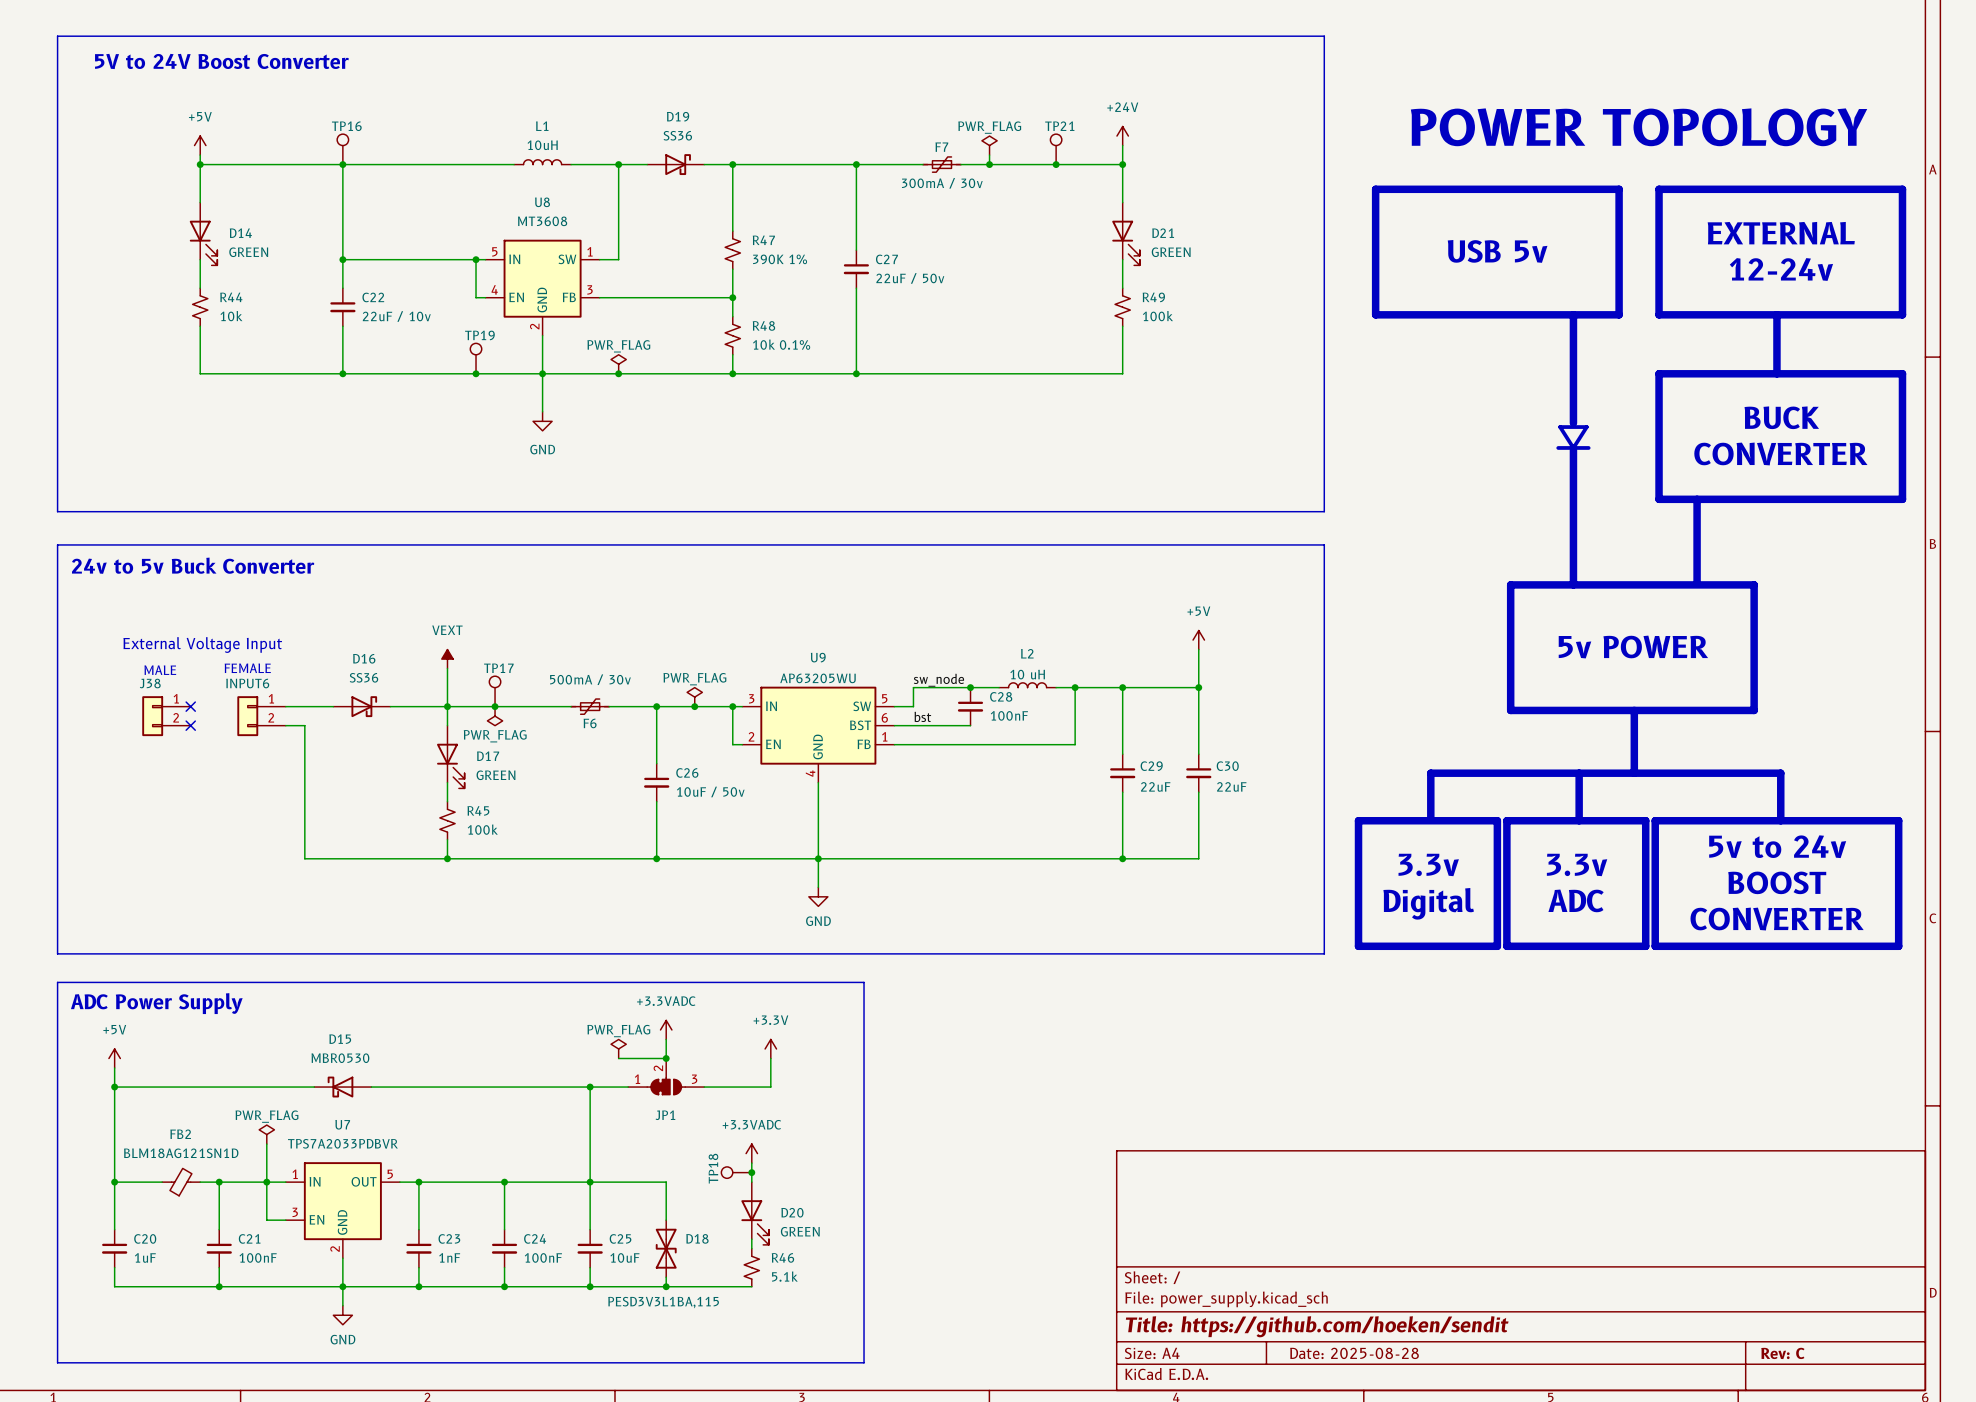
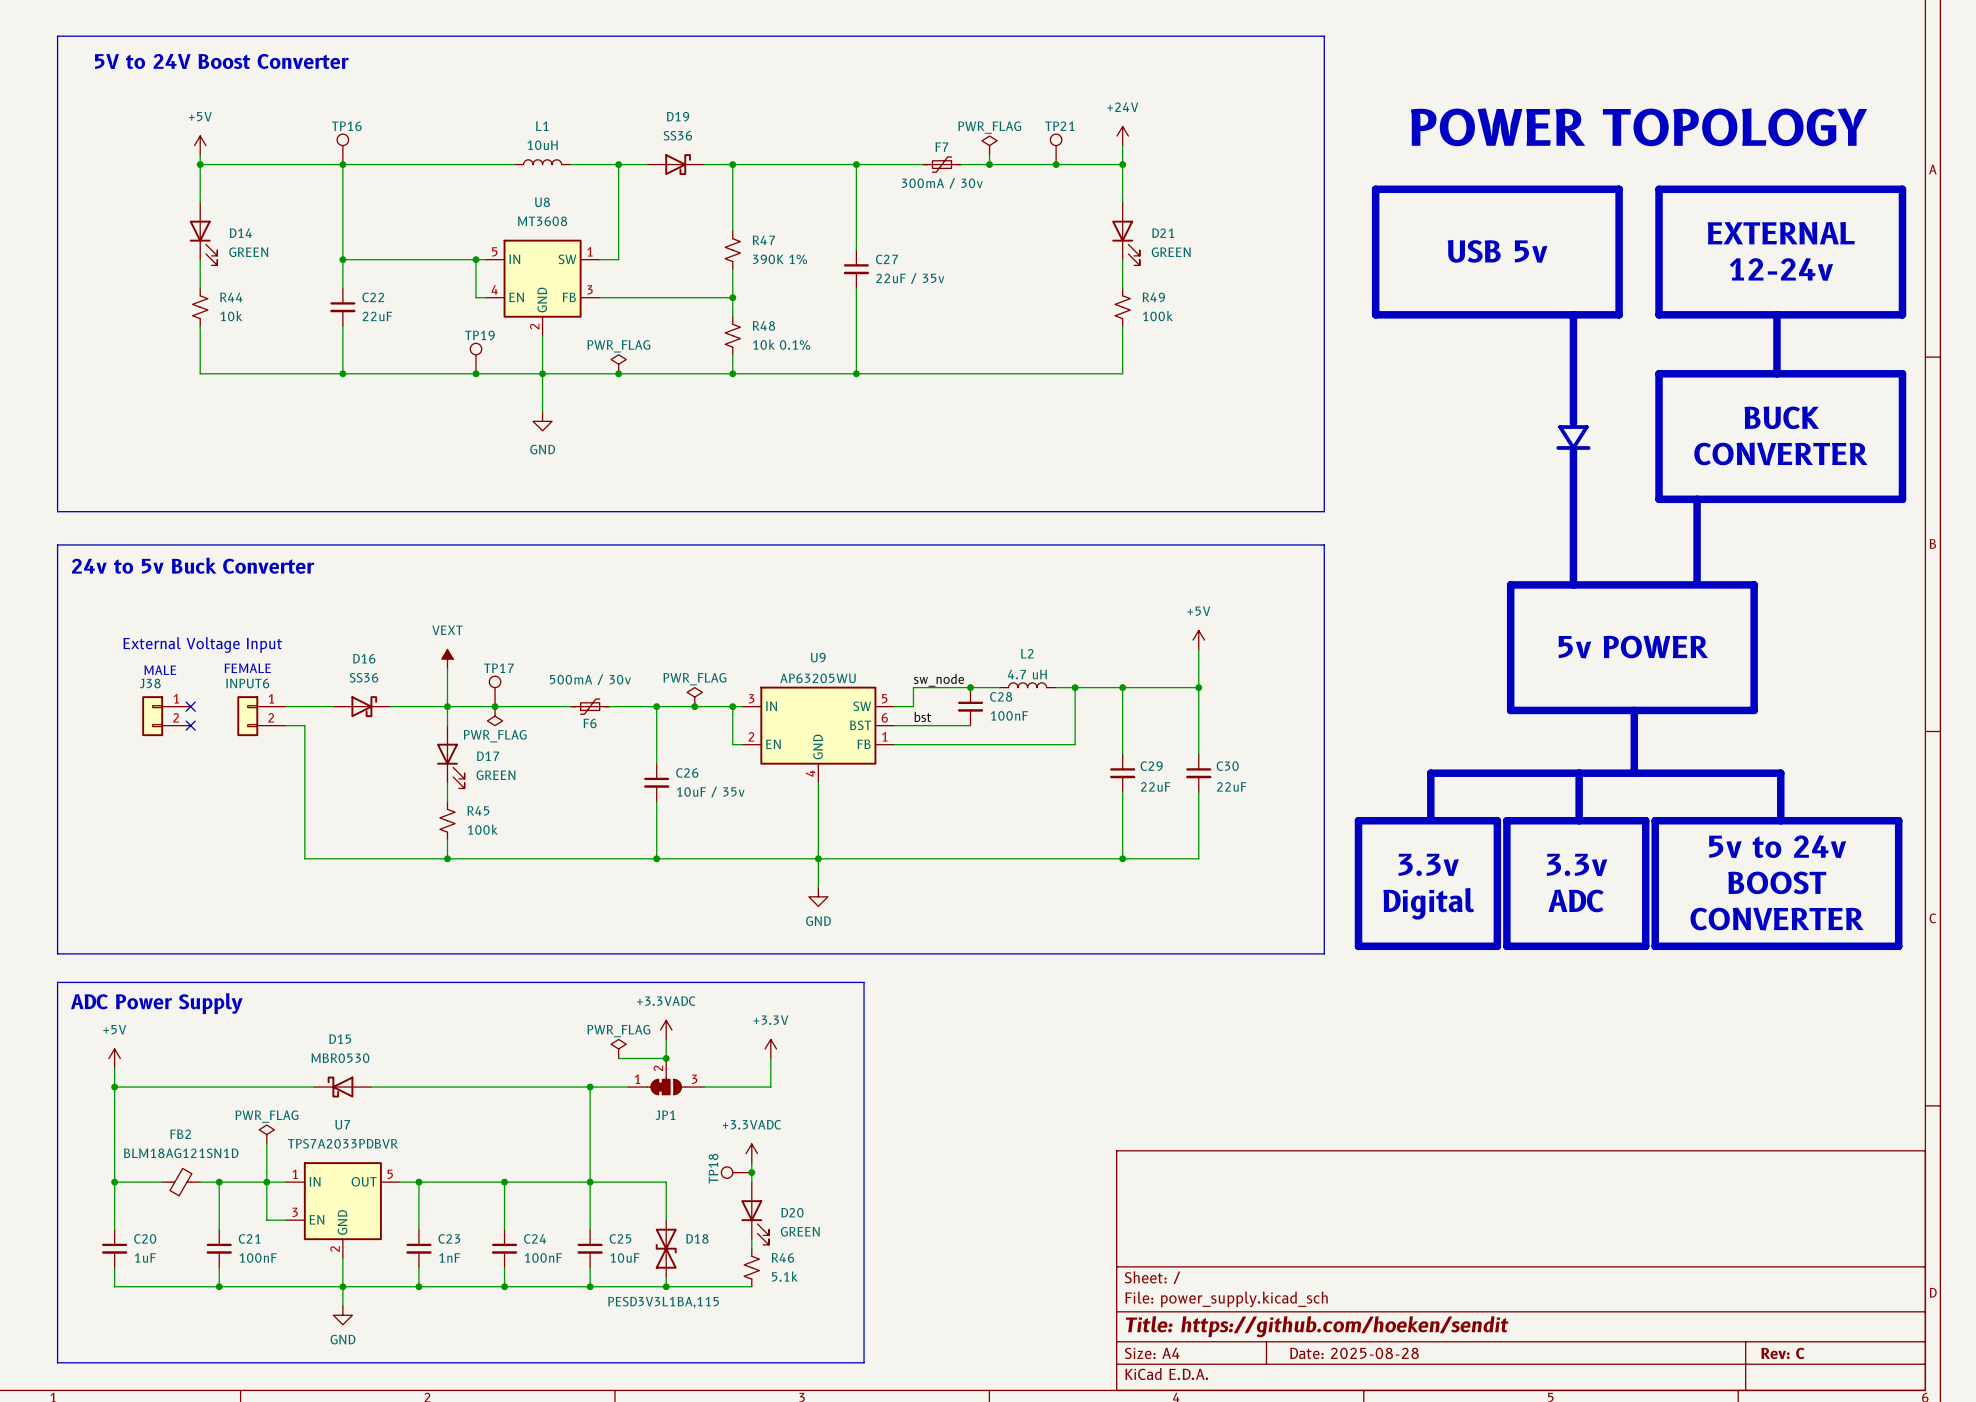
C27 value: 22uF / 50v (910, 278) -> 22uF / 35v (910, 278)
C22 value: 22uF / 10v (396, 316) -> 22uF (377, 316)
L2 value: 10 uH (1027, 674) -> 4.7 uH (1027, 674)
C26 value: 10uF / 50v (710, 791) -> 10uF / 35v (710, 791)

